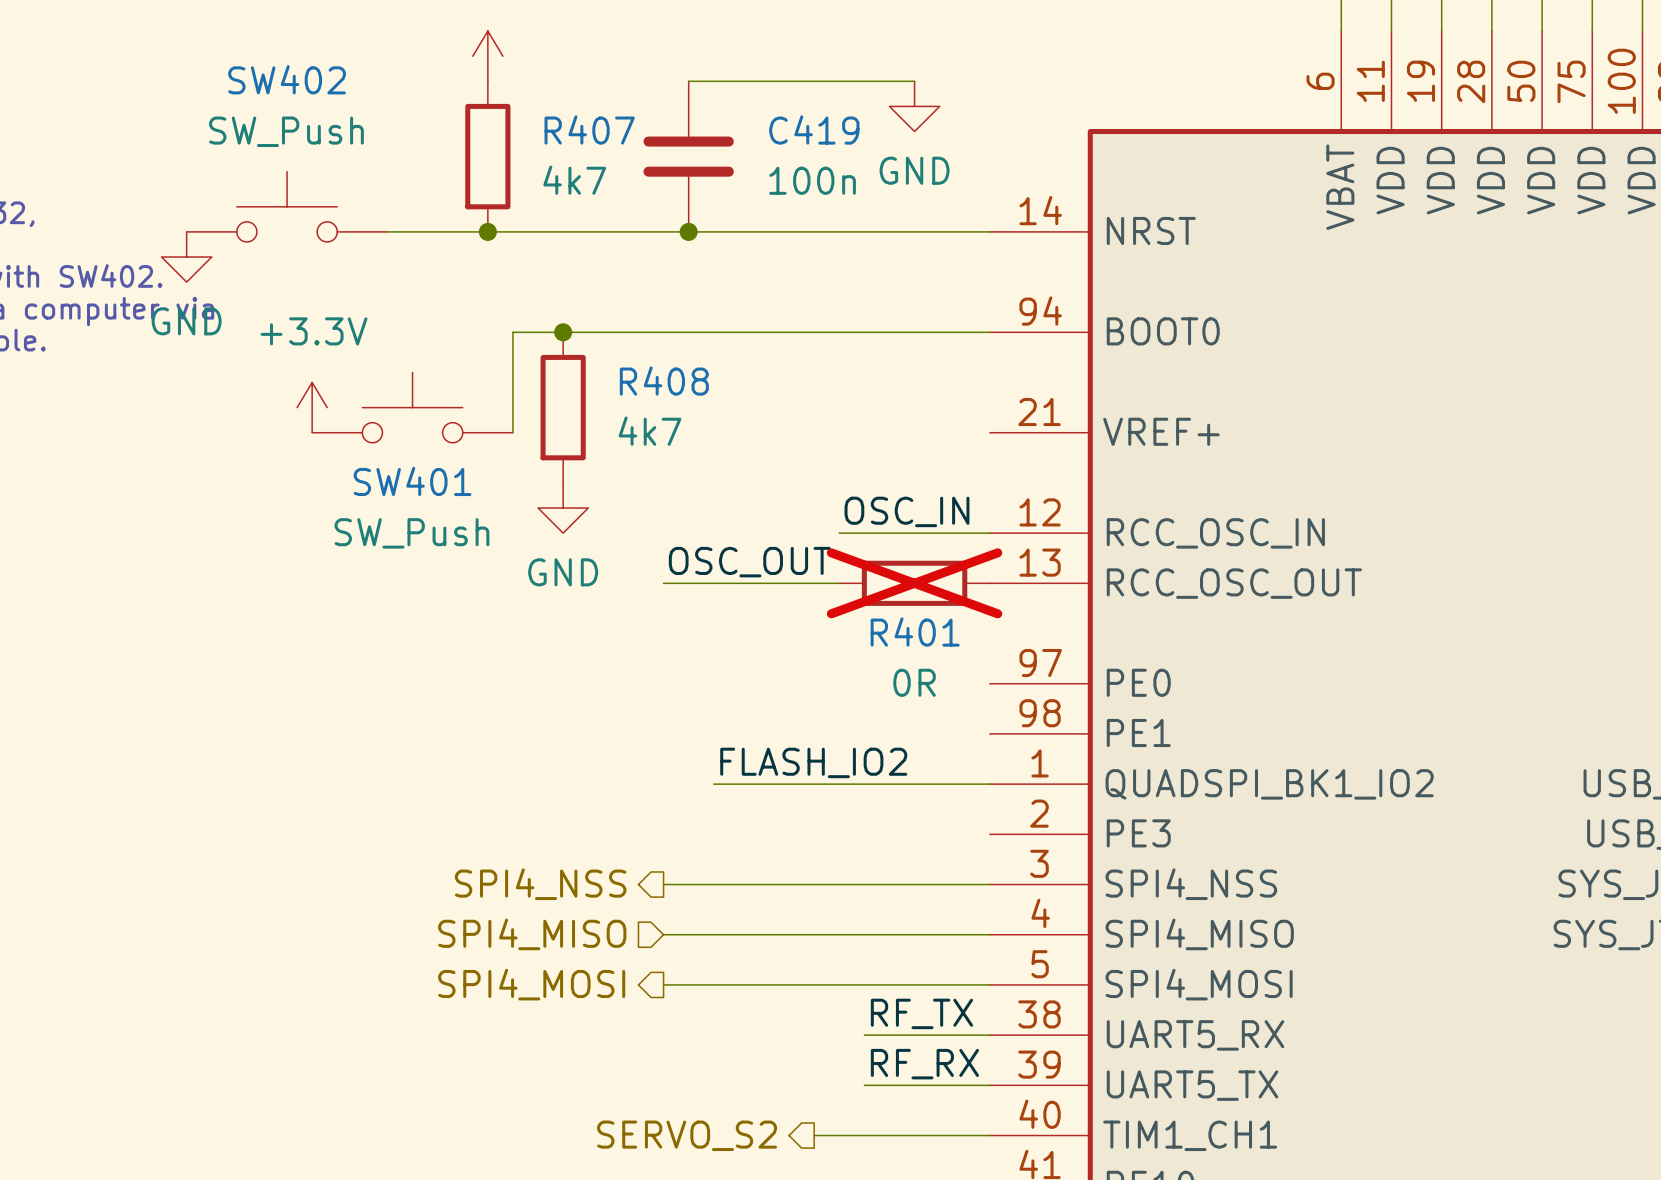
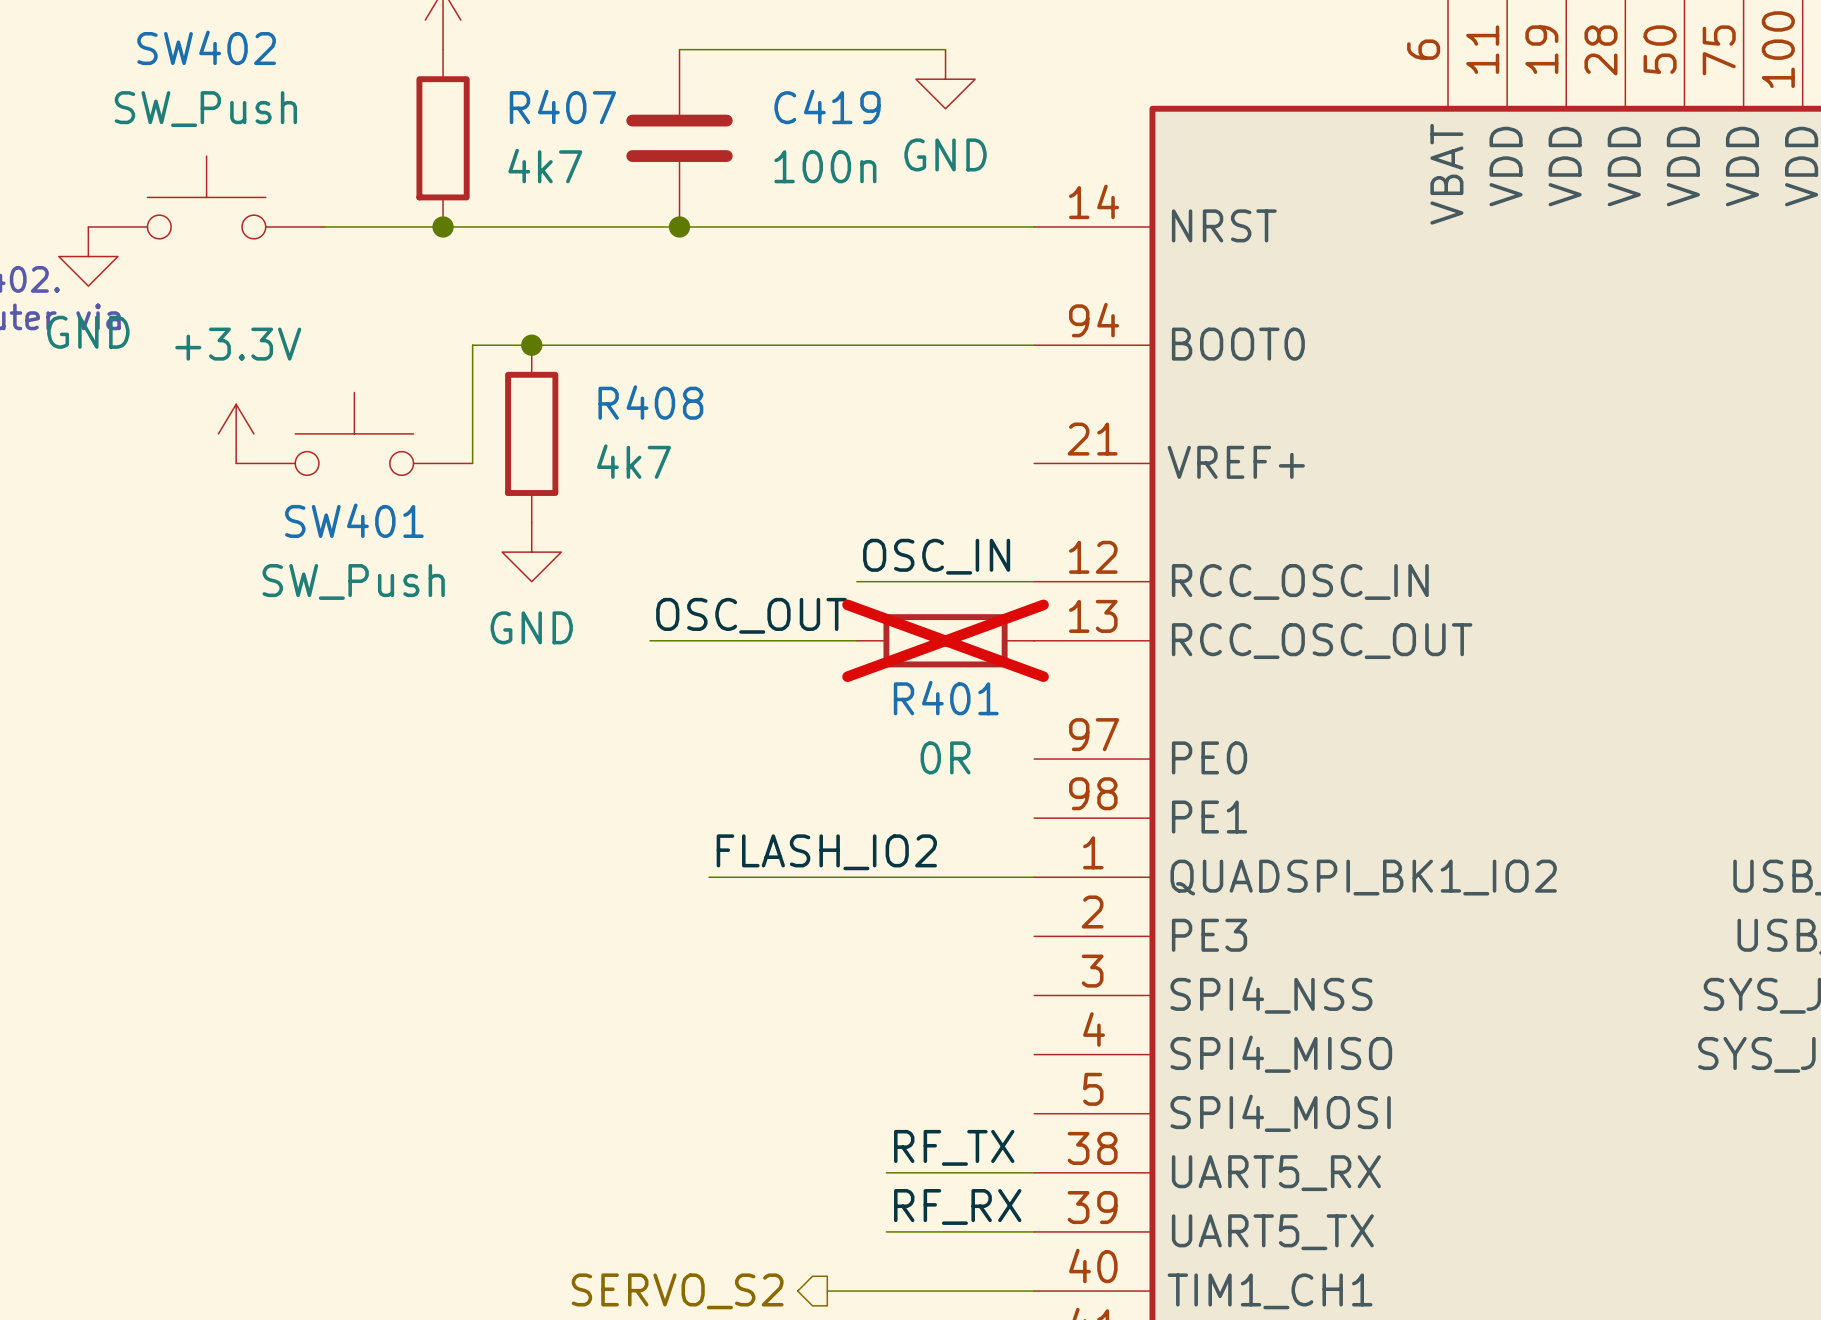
hierarchical label: SPI4_NSS (540, 884) -> none
wire: (663, 884) (989, 884) -> none
hierarchical label: SPI4_MISO (532, 934) -> none
wire: (663, 934) (989, 934) -> none
hierarchical label: SPI4_MOSI (531, 984) -> none
wire: (663, 984) (989, 984) -> none

